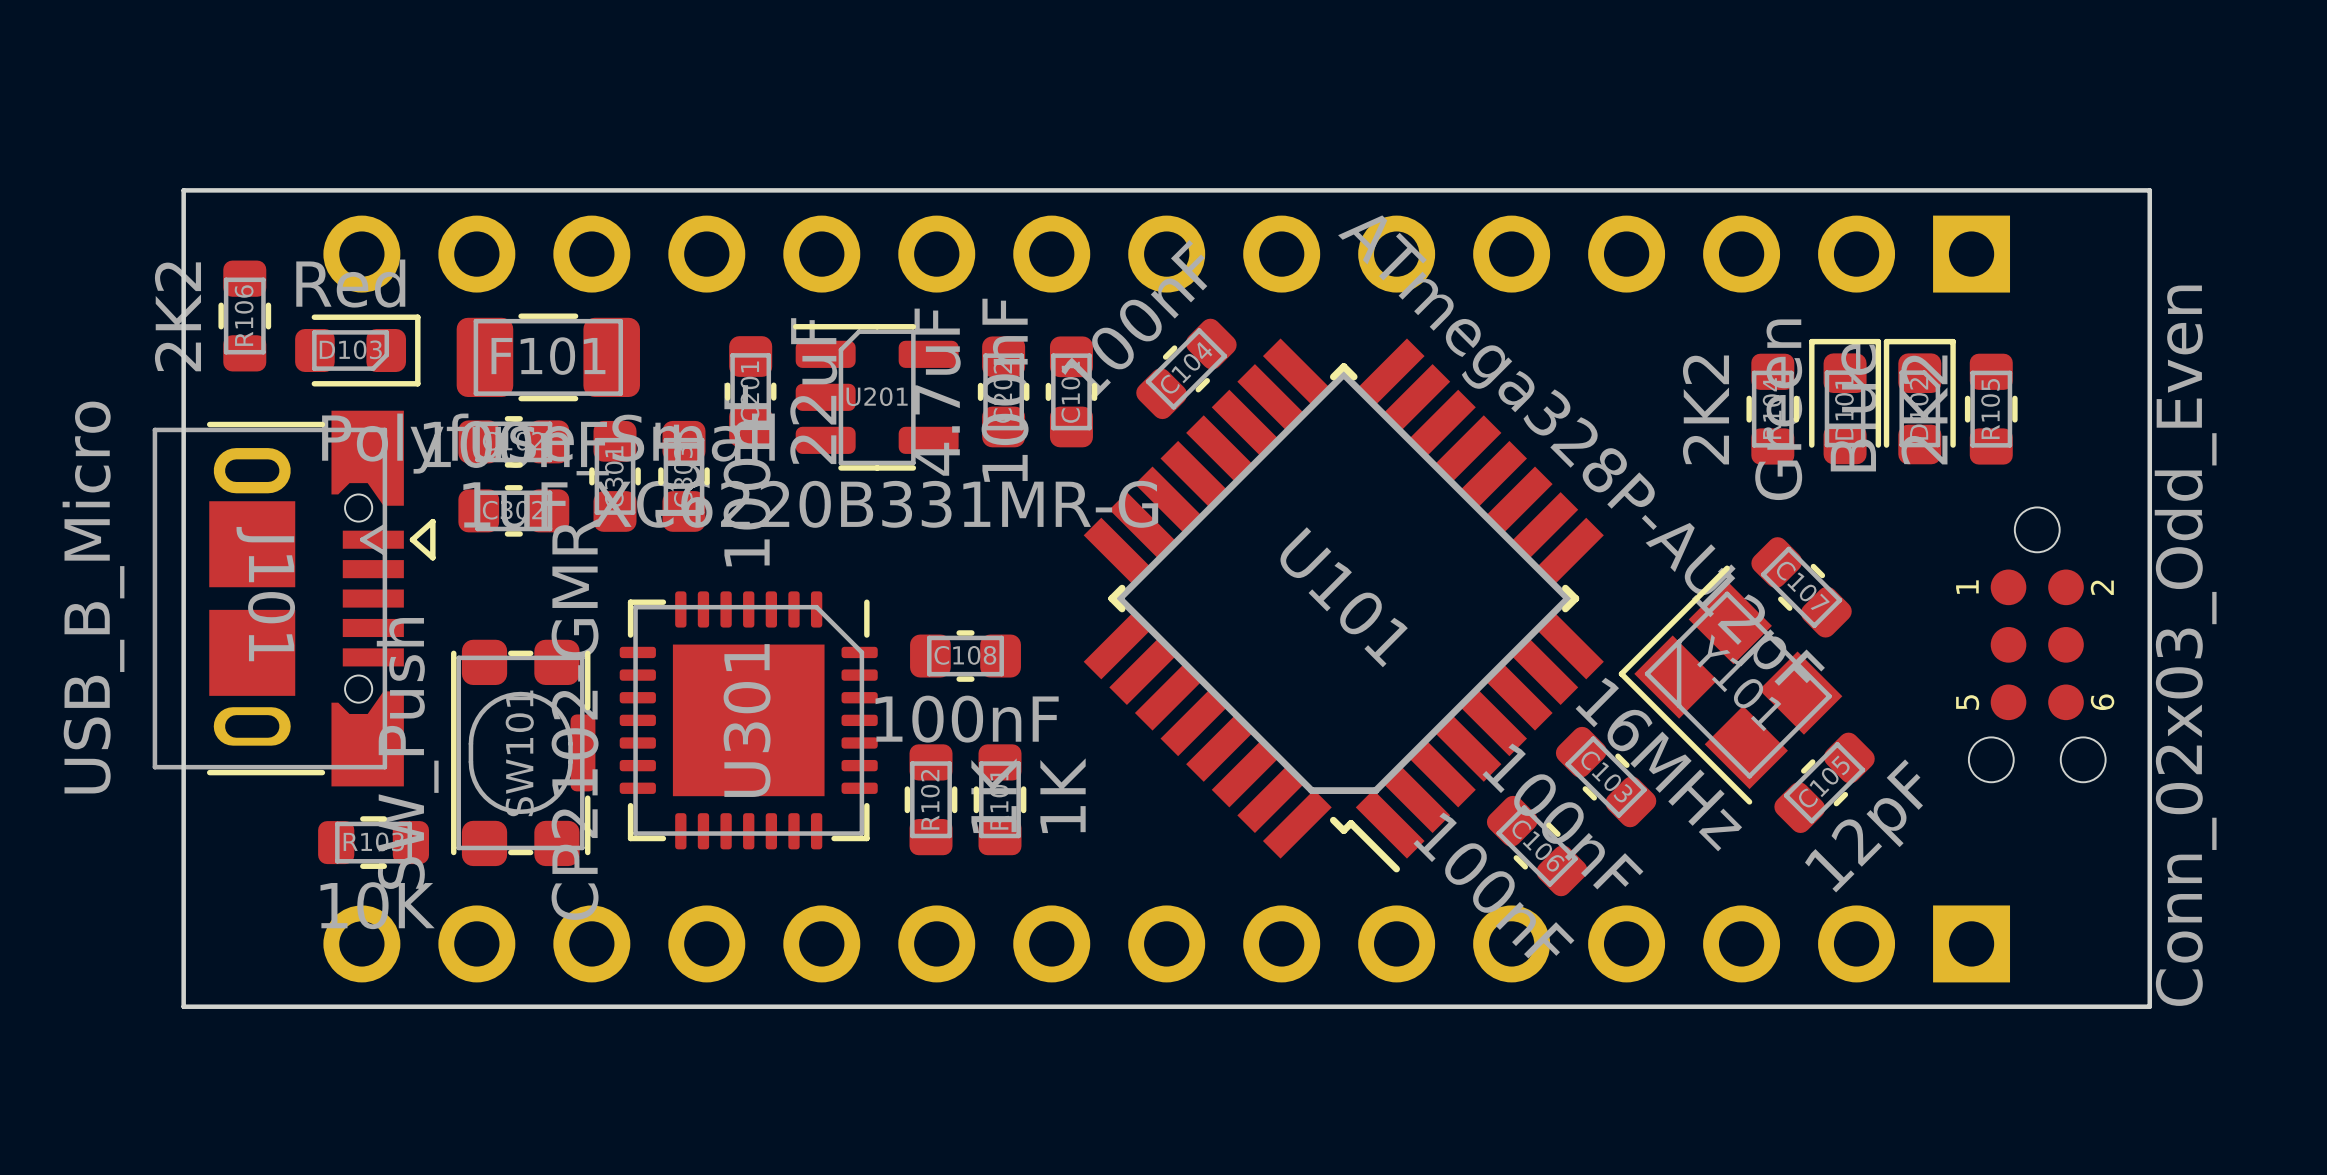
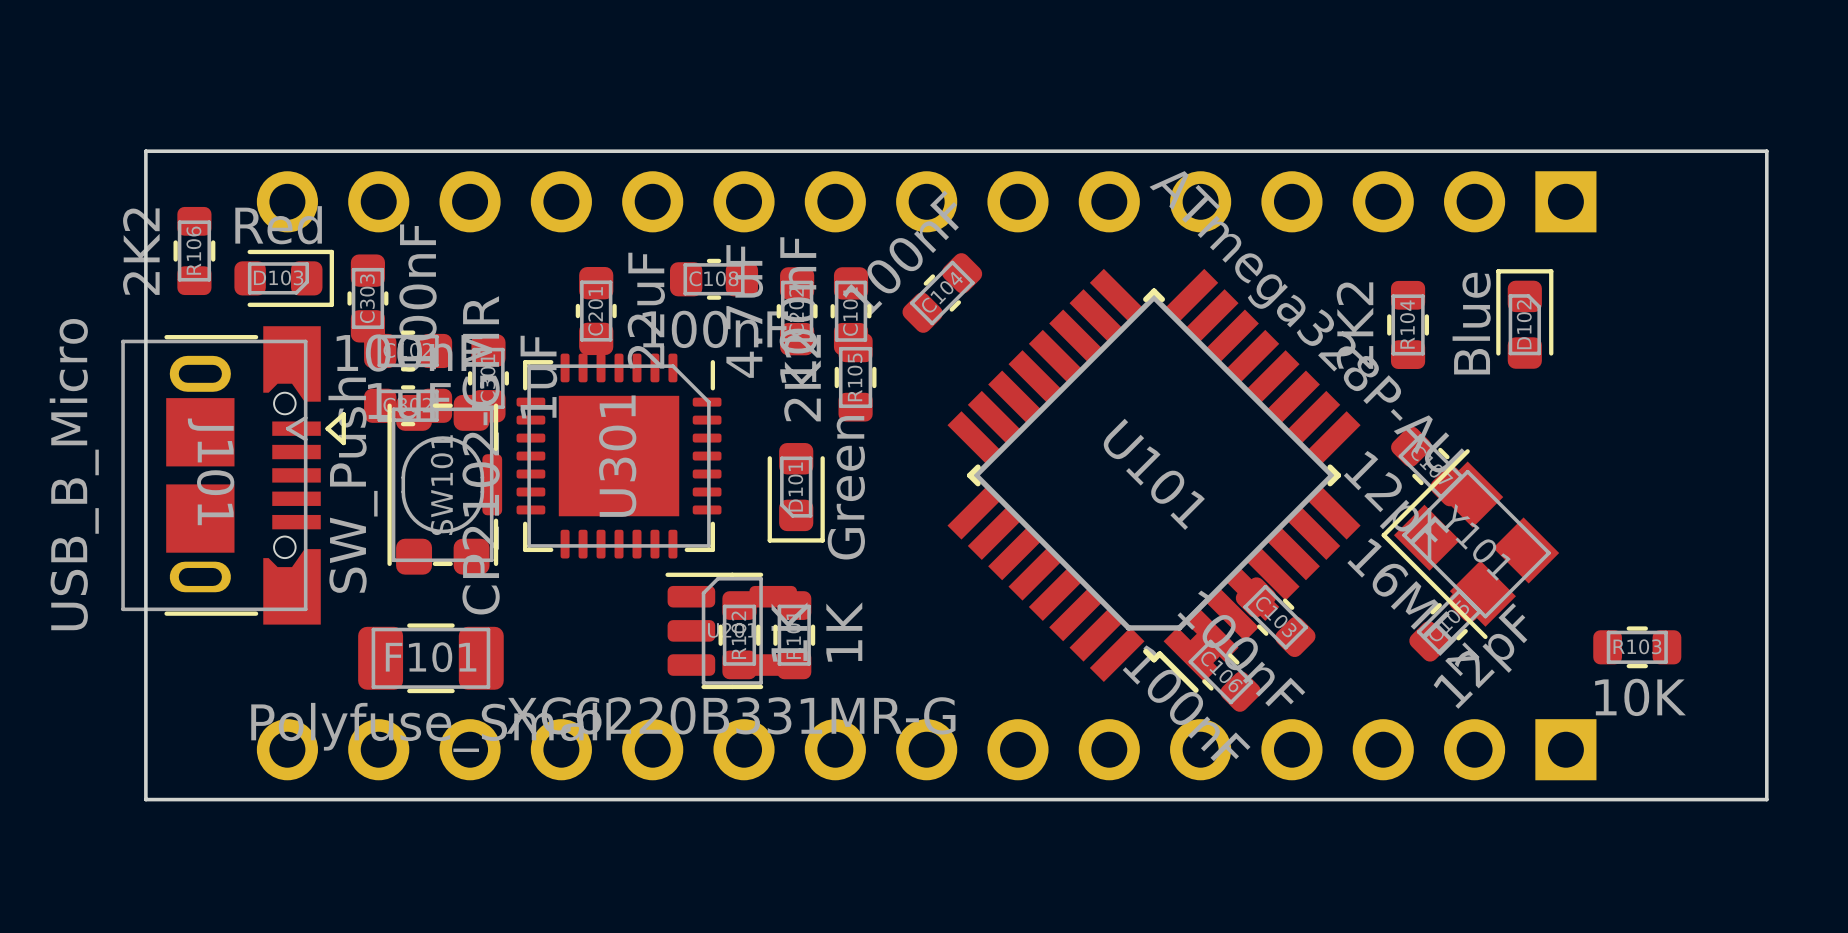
board edge: (2149, 190) (2149, 1006) -> (1707, 151) (1766, 151) (1766, 799) (1707, 799)
F101 position: (548, 357) -> (430, 658)
U201 position: (875, 397) -> (731, 630)
D101 rotation: 0° (1845, 401) -> 180° (796, 492)
D101 position: (1845, 401) -> (796, 492)
R105 position: (1991, 409) -> (855, 377)
C303 position: (683, 476) -> (367, 298)
U101 position: (1343, 605) -> (1154, 480)
part: Conn_02x03_Odd_Even (2037, 644) -> none
C108 position: (965, 656) -> (714, 279)
Y101 position: (1730, 685) -> (1470, 544)
U301 position: (748, 720) -> (619, 456)
SW101 position: (523, 752) -> (444, 484)
R103 position: (373, 842) -> (1637, 647)

